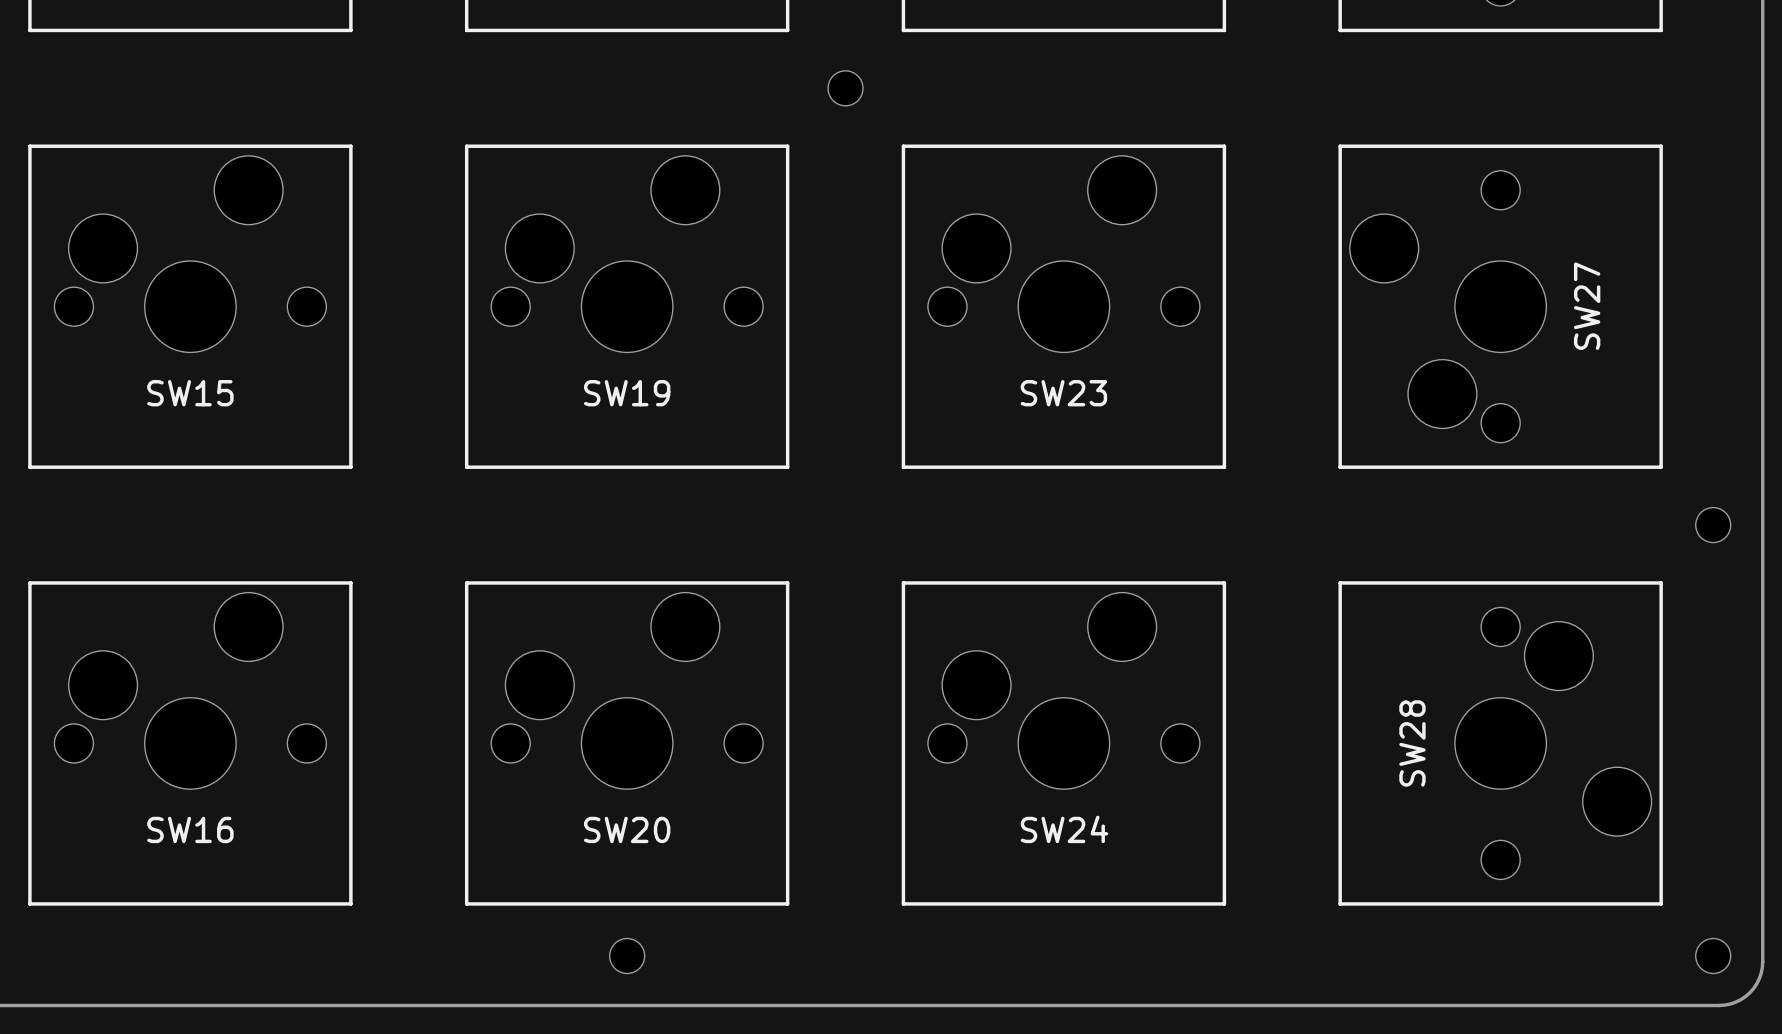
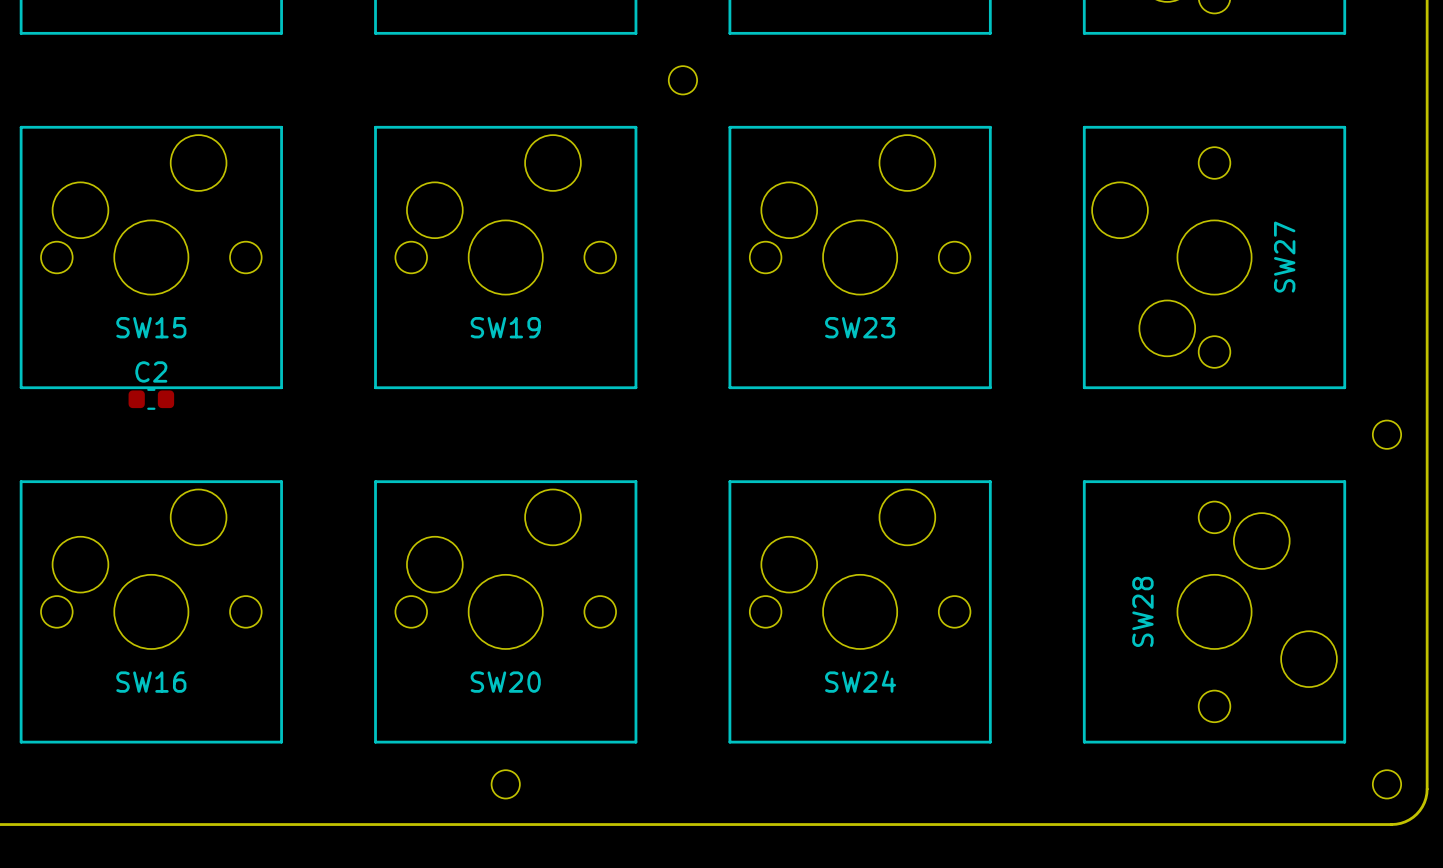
C2: none -> (151, 399)

